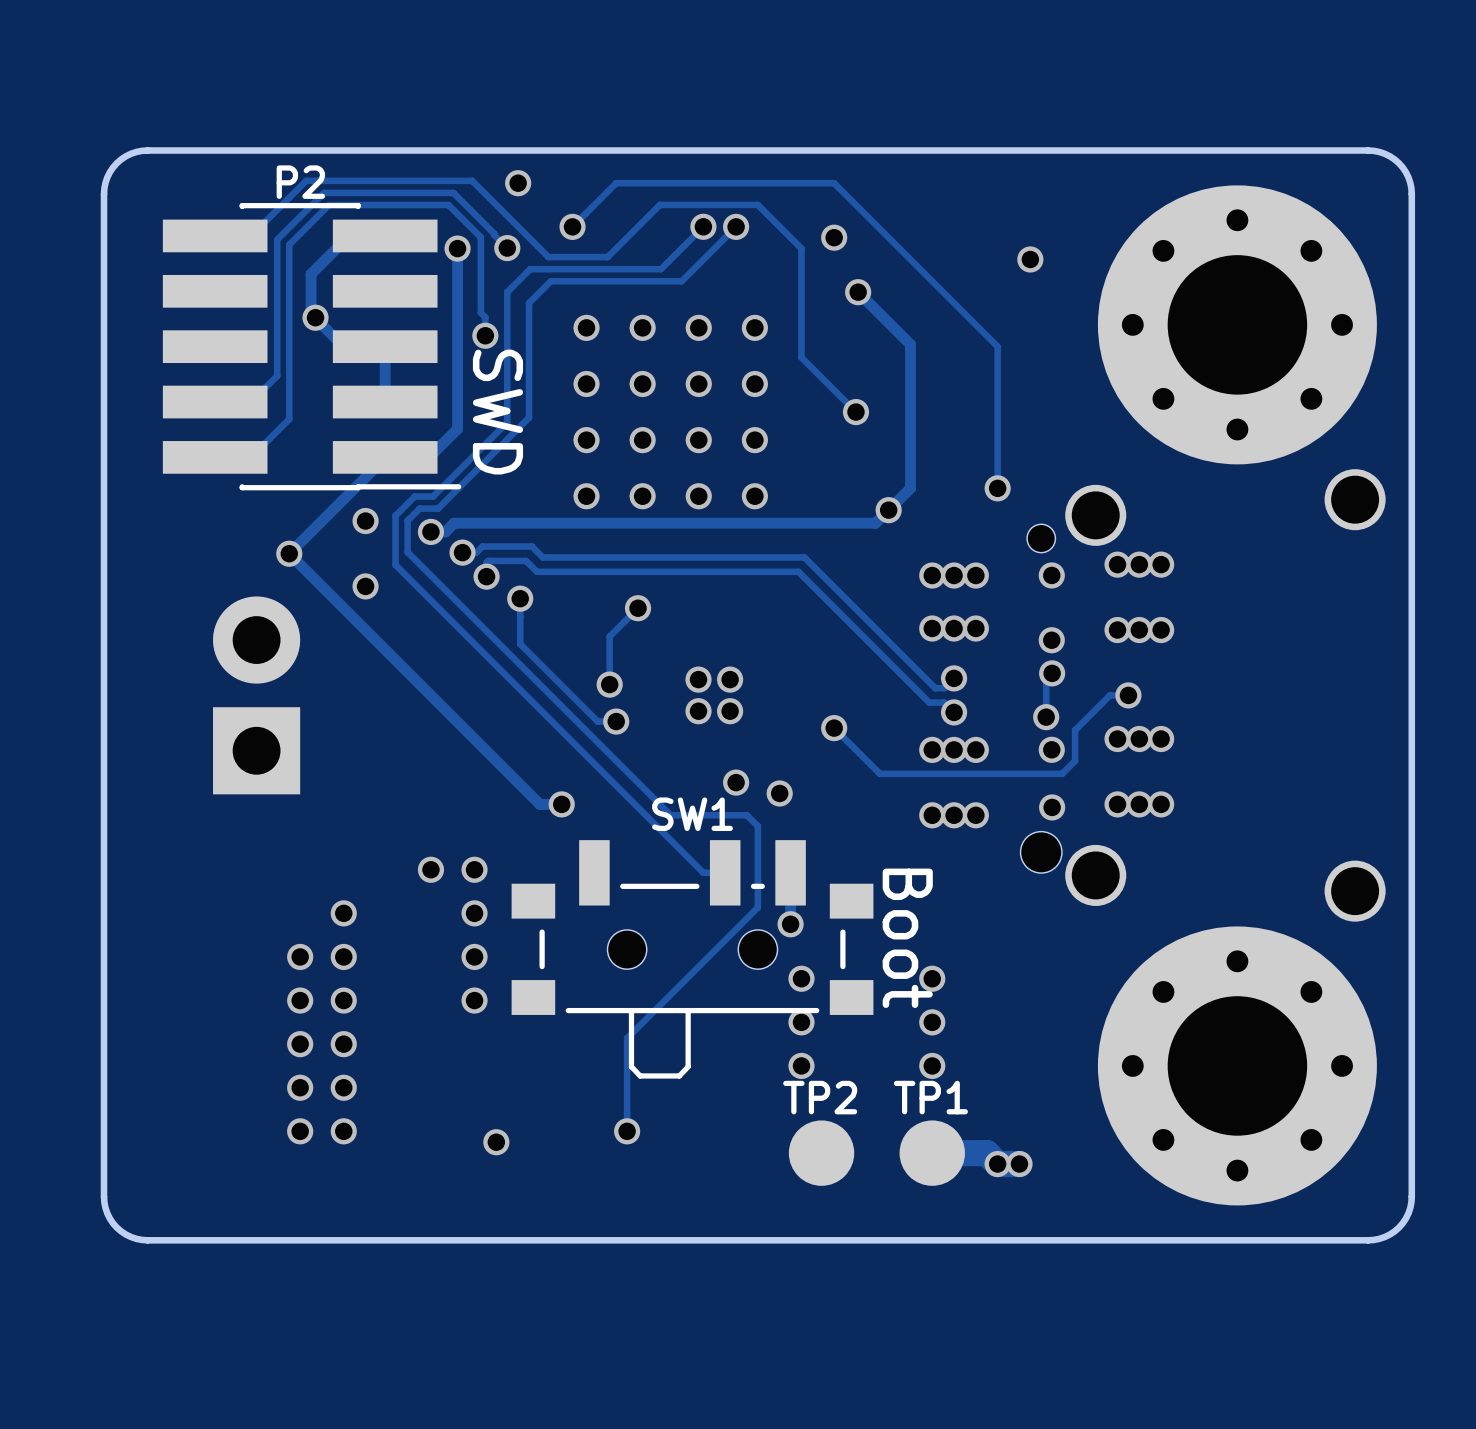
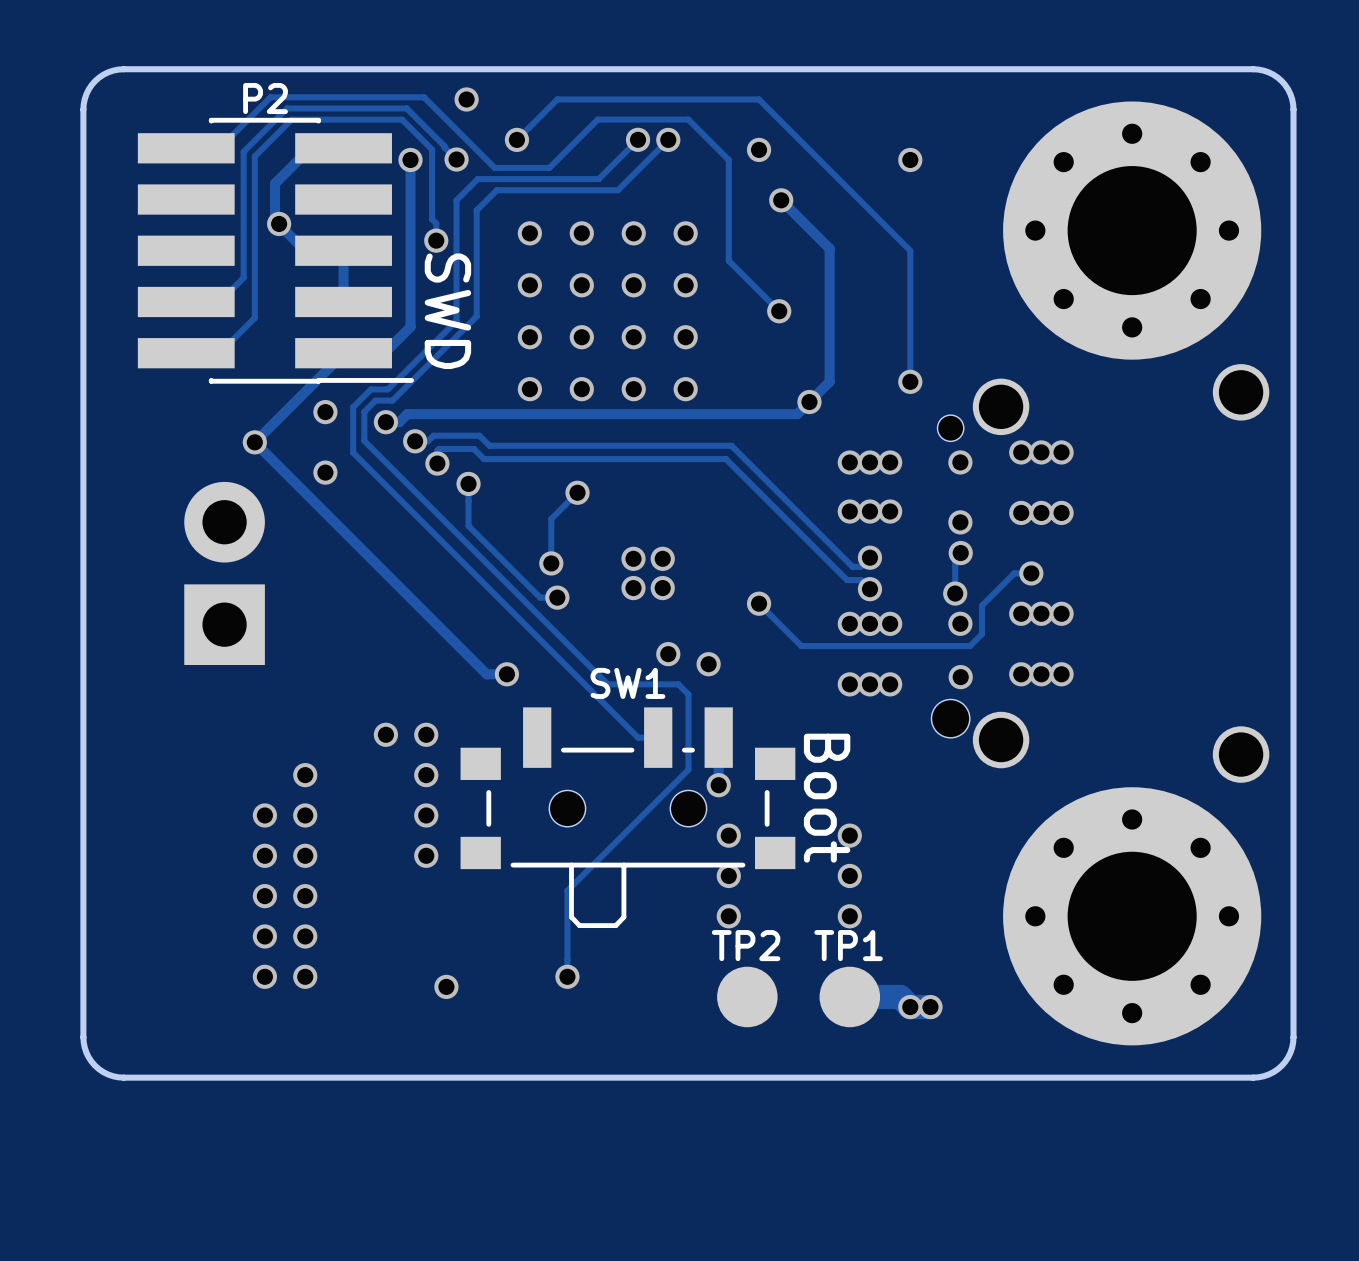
via position: (1030, 259) -> (910, 159)

